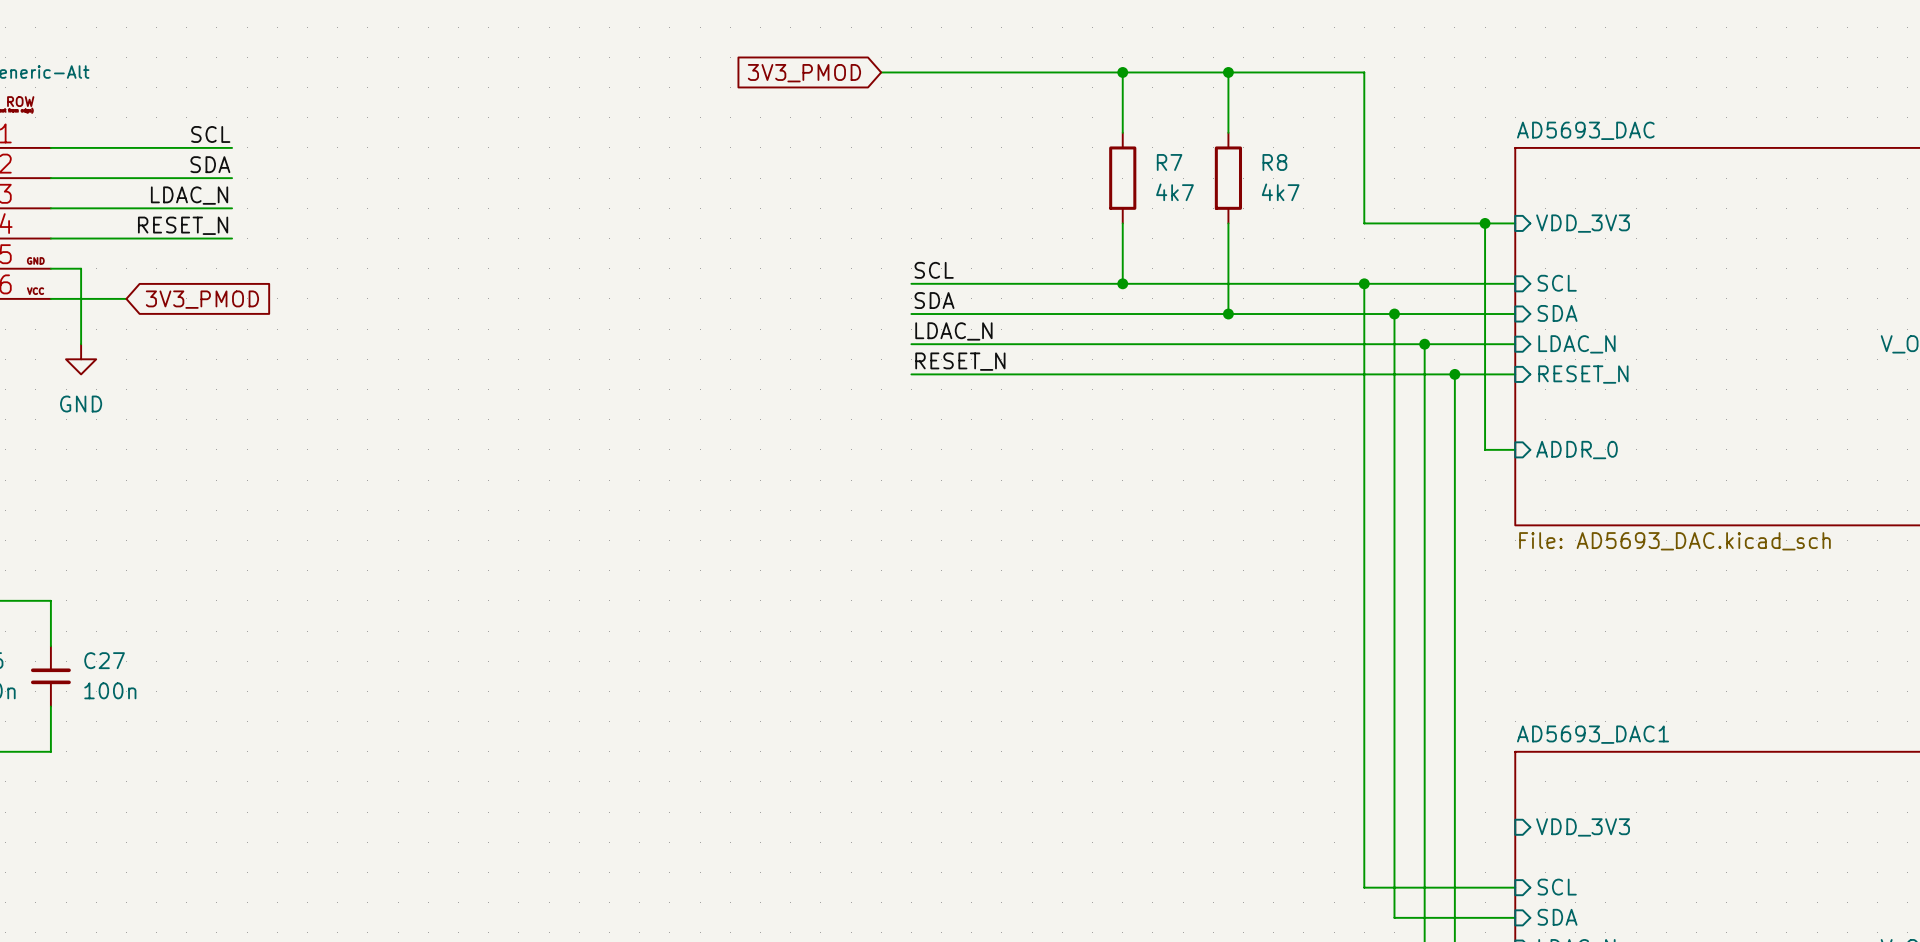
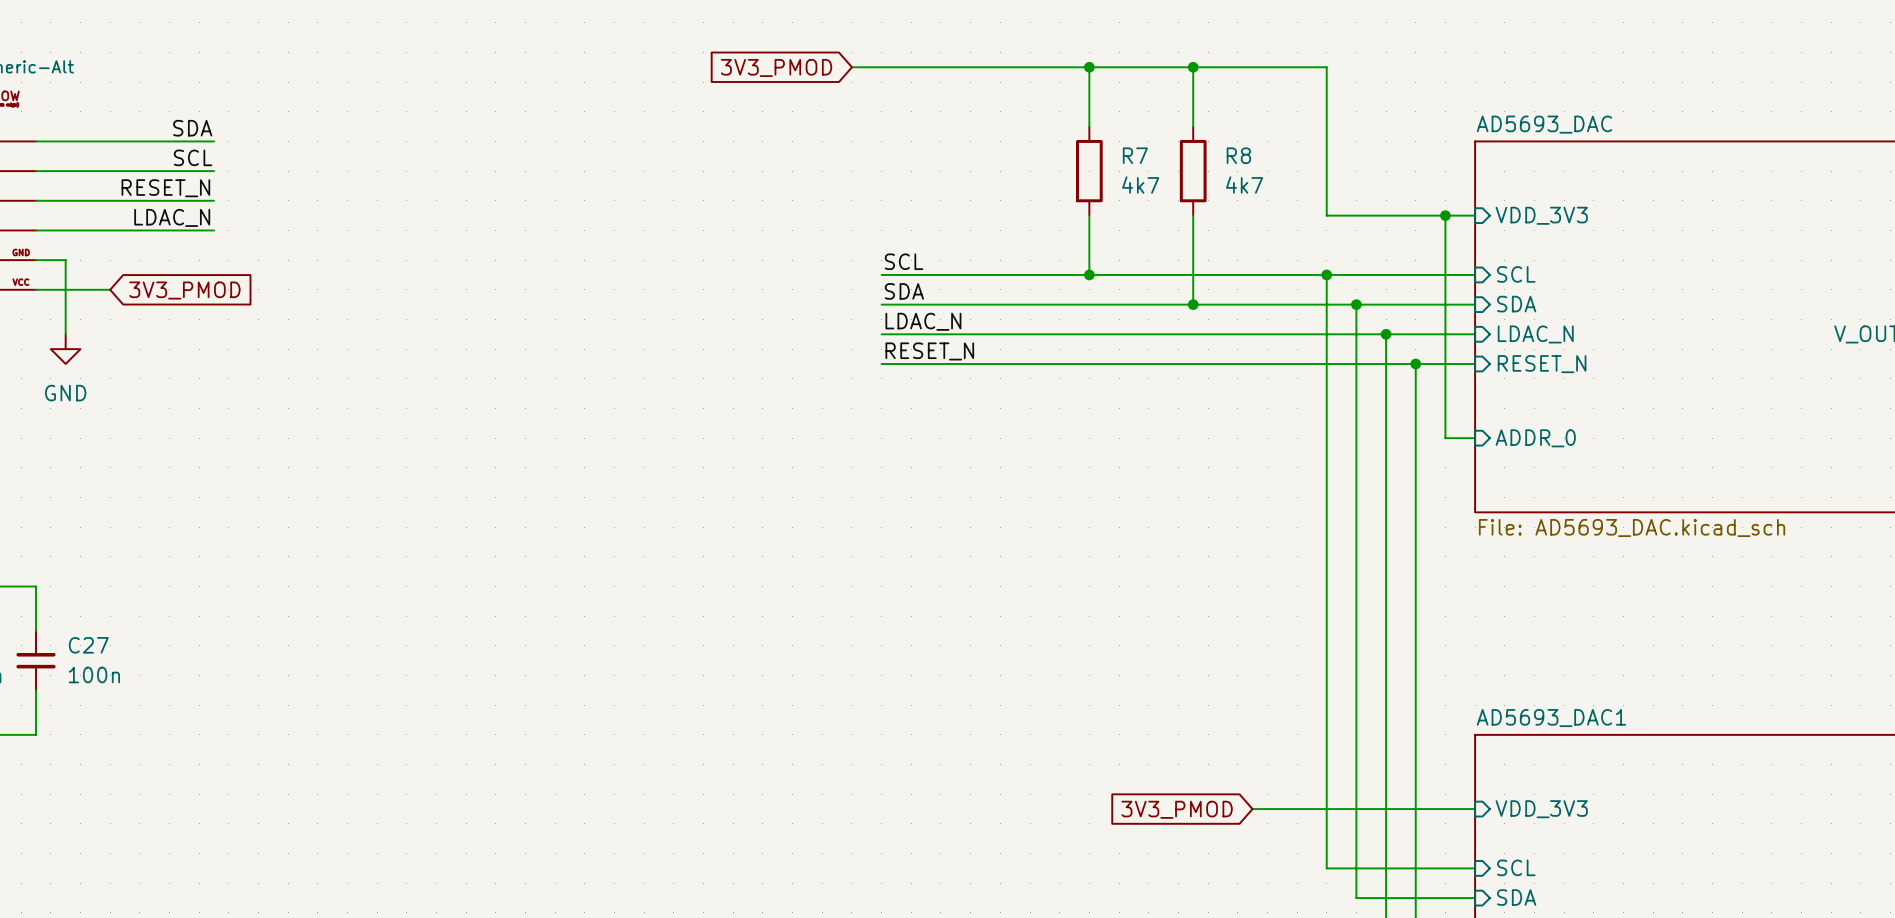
label: SCL (210, 134) -> SDA (192, 128)
label: SDA (210, 164) -> SCL (193, 157)
label: LDAC_N (189, 195) -> RESET_N (165, 188)
label: RESET_N (183, 225) -> LDAC_N (172, 217)
wire: none -> (1252, 809) (1475, 809)
global label: none -> 3V3_PMOD (1177, 809)

